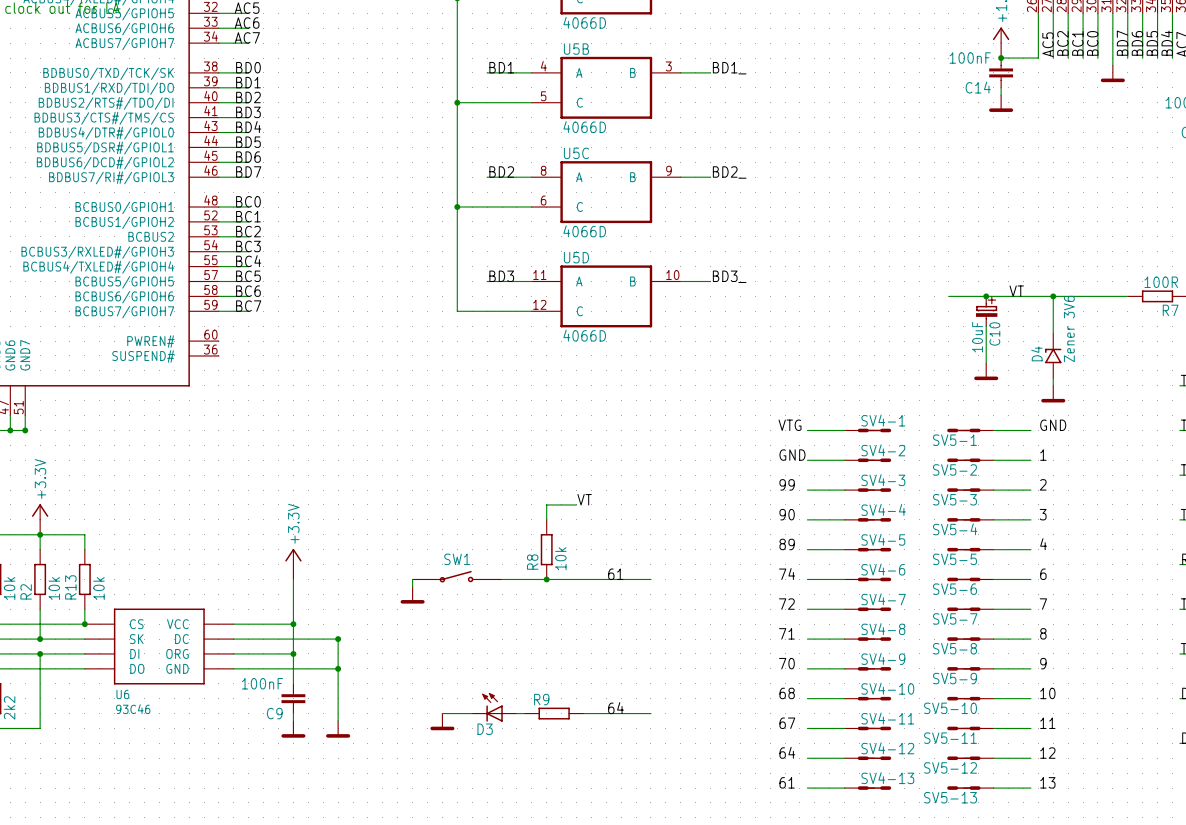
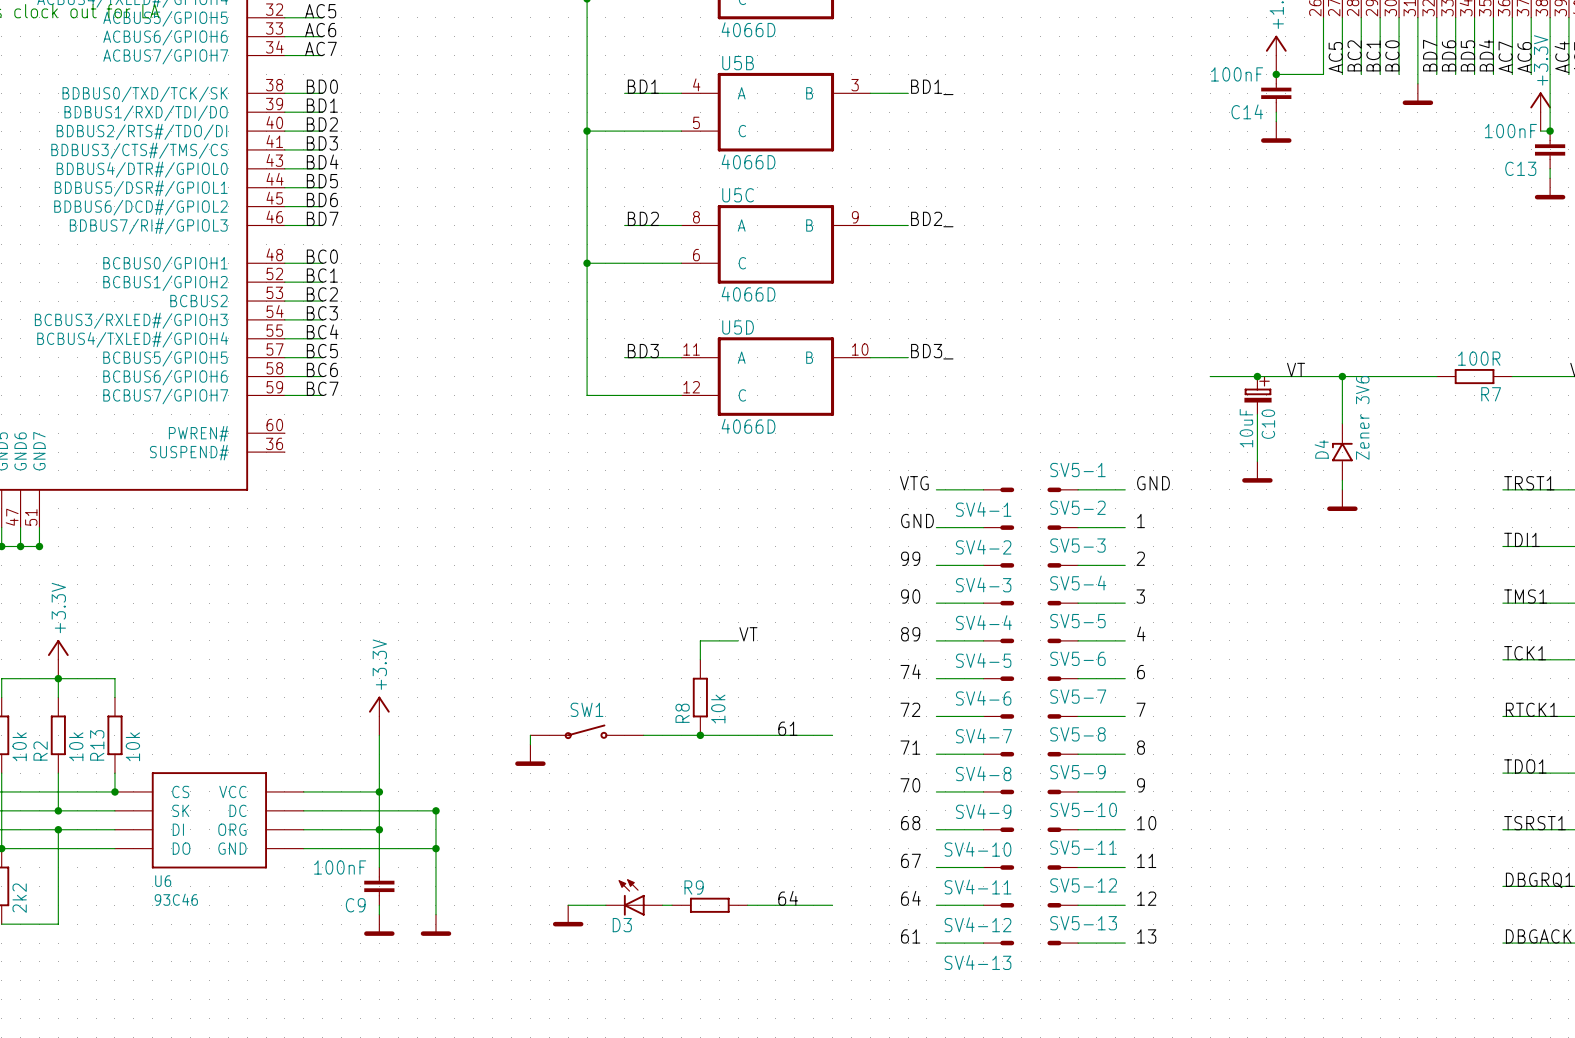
label: none -> GND (1153, 483)
wire: none -> (936, 489) (983, 489)
label: none -> GND (917, 521)
label: none -> 1 (1141, 521)
wire: none -> (936, 527) (983, 527)
SV4-1 name position: SV4-1 (883, 420) -> SV4-1 (983, 509)
label position: VTG (790, 425) -> VTG (914, 483)
label: GND (1053, 425) -> none
SV4-1 symbol: [844, 428, 892, 433] -> [983, 487, 1015, 493]
SV5-1 symbol: [947, 428, 994, 433] -> [1047, 487, 1079, 493]
wire: (807, 430) (844, 430) -> (1078, 489) (1125, 489)
wire: (993, 430) (1030, 430) -> none
label: none -> 2 (1140, 558)
SV5-1 name position: SV5-1 (954, 440) -> SV5-1 (1077, 470)
wire: none -> (936, 565) (983, 565)
SV4-2 name position: SV4-2 (883, 450) -> SV4-2 (983, 547)
label: GND (792, 455) -> none
label: 1 (1043, 455) -> none
SV4-2 symbol: [844, 458, 892, 463] -> [983, 525, 1015, 530]
SV5-2 symbol: [947, 458, 994, 463] -> [1047, 525, 1079, 530]
wire: (807, 460) (844, 460) -> (1078, 527) (1125, 527)
wire: (993, 460) (1030, 460) -> none
label: none -> 3 (1140, 596)
SV5-2 name position: SV5-2 (954, 469) -> SV5-2 (1077, 507)
wire: none -> (936, 603) (983, 603)
SV4-3 name position: SV4-3 (883, 480) -> SV4-3 (983, 584)
label position: 99 (787, 484) -> 99 (910, 558)
label: 2 (1043, 484) -> none
SV4-3 symbol: [844, 488, 892, 492] -> [983, 563, 1015, 568]
SV5-3 symbol: [947, 488, 994, 492] -> [1047, 563, 1079, 568]
wire: (807, 490) (844, 490) -> (1078, 565) (1125, 565)
wire: (993, 490) (1030, 490) -> none
label: none -> 4 (1141, 633)
SV5-3 name position: SV5-3 (954, 499) -> SV5-3 (1077, 545)
wire: none -> (936, 640) (983, 640)
SV4-4 name position: SV4-4 (883, 509) -> SV4-4 (983, 622)
label position: 90 (787, 514) -> 90 (910, 596)
label: 3 (1043, 514) -> none
SV4-4 symbol: [844, 518, 892, 522] -> [983, 600, 1015, 606]
SV5-4 symbol: [947, 518, 994, 522] -> [1047, 600, 1079, 606]
wire: (807, 519) (844, 519) -> (1078, 603) (1125, 603)
wire: (993, 519) (1030, 519) -> none
label: none -> 6 (1141, 672)
SV5-4 name position: SV5-4 (955, 529) -> SV5-4 (1078, 583)
wire: none -> (936, 678) (983, 678)
SV4-5 name position: SV4-5 (883, 539) -> SV4-5 (983, 660)
label position: 89 (787, 544) -> 89 (910, 634)
label: 4 (1043, 544) -> none
SV4-5 symbol: [844, 547, 892, 552] -> [983, 638, 1015, 644]
SV5-5 symbol: [947, 547, 994, 552] -> [1047, 638, 1079, 644]
wire: (807, 549) (844, 549) -> (1078, 640) (1125, 640)
wire: (993, 549) (1030, 549) -> none
label: none -> 7 (1141, 709)
SV5-5 name position: SV5-5 (954, 559) -> SV5-5 (1077, 621)
wire: none -> (936, 716) (983, 716)
SV4-6 name position: SV4-6 (883, 569) -> SV4-6 (983, 698)
label position: 74 (787, 574) -> 74 (910, 671)
label: 6 (1043, 574) -> none
SV4-6 symbol: [844, 577, 892, 582] -> [983, 676, 1015, 681]
SV5-6 symbol: [947, 577, 994, 582] -> [1047, 676, 1079, 681]
wire: (807, 579) (844, 579) -> (1078, 678) (1125, 678)
wire: (993, 579) (1030, 579) -> none
label: none -> 8 (1141, 747)
SV5-6 name position: SV5-6 (954, 589) -> SV5-6 (1077, 658)
wire: none -> (936, 754) (983, 754)
SV4-7 name position: SV4-7 (883, 599) -> SV4-7 (983, 735)
label position: 72 (786, 604) -> 72 (910, 709)
label: 7 (1043, 604) -> none
SV4-7 symbol: [844, 607, 892, 612] -> [983, 714, 1015, 719]
SV5-7 symbol: [947, 607, 994, 612] -> [1047, 714, 1079, 719]
wire: (807, 609) (844, 609) -> (1078, 716) (1125, 716)
wire: (993, 609) (1030, 609) -> none
label: none -> 9 (1141, 785)
SV5-7 name position: SV5-7 (955, 618) -> SV5-7 (1078, 696)
wire: none -> (936, 791) (983, 791)
SV4-8 name position: SV4-8 (883, 629) -> SV4-8 (983, 773)
label position: 71 (786, 633) -> 71 (910, 747)
label: 8 (1043, 633) -> none
SV4-8 symbol: [844, 637, 892, 641] -> [983, 751, 1015, 757]
SV5-8 symbol: [947, 637, 994, 641] -> [1047, 751, 1079, 757]
wire: (807, 639) (844, 639) -> (1078, 754) (1125, 754)
wire: (993, 639) (1030, 639) -> none
label: none -> 10 (1146, 823)
SV5-8 name position: SV5-8 (954, 648) -> SV5-8 (1077, 734)
wire: none -> (936, 829) (983, 829)
SV4-9 name position: SV4-9 (883, 658) -> SV4-9 (983, 811)
label position: 70 (786, 663) -> 70 (910, 785)
label: 9 (1043, 663) -> none
SV4-9 symbol: [844, 667, 892, 671] -> [983, 789, 1015, 795]
SV5-9 symbol: [947, 667, 994, 671] -> [1047, 789, 1079, 795]
wire: (807, 668) (844, 668) -> (1078, 791) (1125, 791)
wire: (993, 668) (1030, 668) -> none
label: none -> 11 (1146, 860)
SV5-9 name position: SV5-9 (954, 678) -> SV5-9 (1077, 772)
wire: none -> (936, 867) (983, 867)
SV4-10 name position: SV4-10 (887, 688) -> SV4-10 (977, 849)
label position: 68 (787, 693) -> 68 (910, 823)
label: 10 (1047, 693) -> none
SV4-10 symbol: [844, 696, 892, 701] -> [983, 827, 1015, 833]
SV5-10 symbol: [947, 696, 994, 701] -> [1047, 827, 1079, 833]
wire: (807, 698) (844, 698) -> (1078, 829) (1125, 829)
wire: (993, 698) (1030, 698) -> none
label: none -> 12 (1146, 898)
SV5-10 name position: SV5-10 (950, 708) -> SV5-10 (1083, 809)
wire: none -> (936, 905) (983, 905)
SV4-11 name position: SV4-11 (887, 718) -> SV4-11 (977, 887)
label position: 67 (787, 723) -> 67 (910, 860)
label: 11 (1047, 723) -> none
SV4-11 symbol: [844, 726, 892, 731] -> [983, 865, 1015, 870]
SV5-11 symbol: [947, 726, 994, 731] -> [1047, 865, 1079, 870]
wire: (807, 728) (844, 728) -> (1078, 867) (1125, 867)
wire: (993, 728) (1030, 728) -> none
label: none -> 13 (1146, 936)
SV5-11 name position: SV5-11 (950, 738) -> SV5-11 (1083, 847)
wire: none -> (936, 943) (983, 943)
SV4-12 name position: SV4-12 (887, 748) -> SV4-12 (977, 924)
label position: 64 (787, 752) -> 64 (910, 898)
label: 12 (1047, 753) -> none
SV4-12 symbol: [844, 756, 892, 761] -> [983, 903, 1015, 908]
SV5-12 symbol: [947, 756, 994, 761] -> [1047, 903, 1079, 908]
wire: (807, 758) (844, 758) -> (1078, 905) (1125, 905)
wire: (993, 758) (1030, 758) -> none
SV5-12 name position: SV5-12 (950, 767) -> SV5-12 (1083, 885)
SV4-13 name position: SV4-13 (887, 778) -> SV4-13 (977, 962)
label position: 61 (787, 782) -> 61 (910, 936)
label: 13 (1047, 782) -> none
SV4-13 symbol: [844, 786, 892, 790] -> [983, 940, 1015, 946]
SV5-13 symbol: [947, 786, 994, 790] -> [1047, 940, 1079, 946]
wire: (807, 788) (844, 788) -> (1078, 943) (1125, 943)
wire: (993, 788) (1030, 788) -> none
SV5-13 name position: SV5-13 (950, 797) -> SV5-13 (1083, 923)

